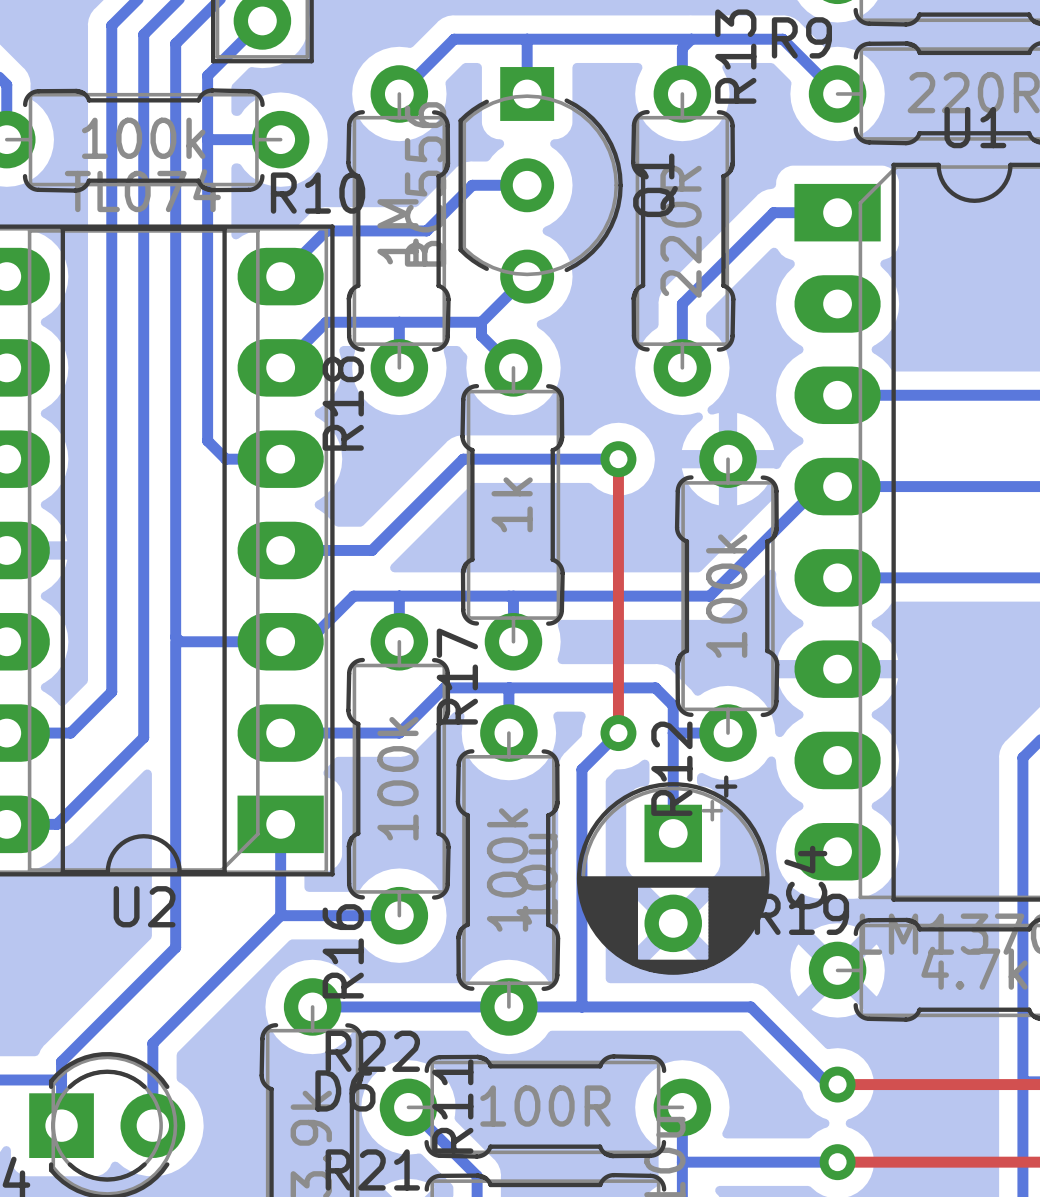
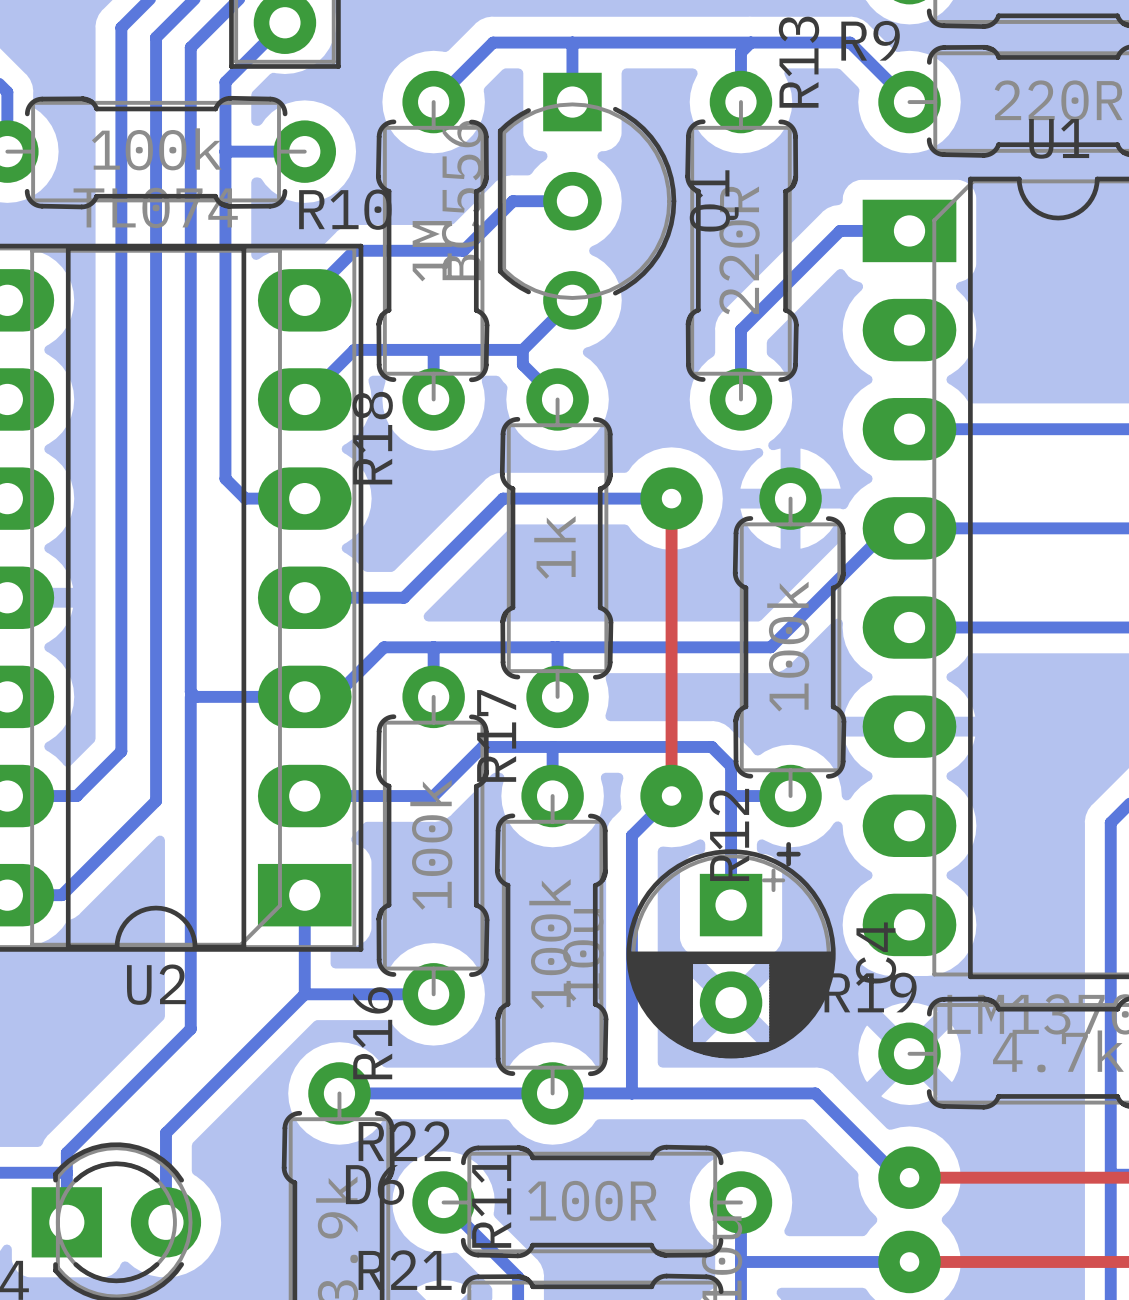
via size: [600, 441, 637, 478] -> [640, 467, 703, 530]
via size: [600, 715, 637, 752] -> [640, 764, 703, 828]
via size: [819, 1066, 856, 1103] -> [878, 1146, 941, 1209]
via size: [819, 1144, 856, 1181] -> [878, 1230, 941, 1294]

